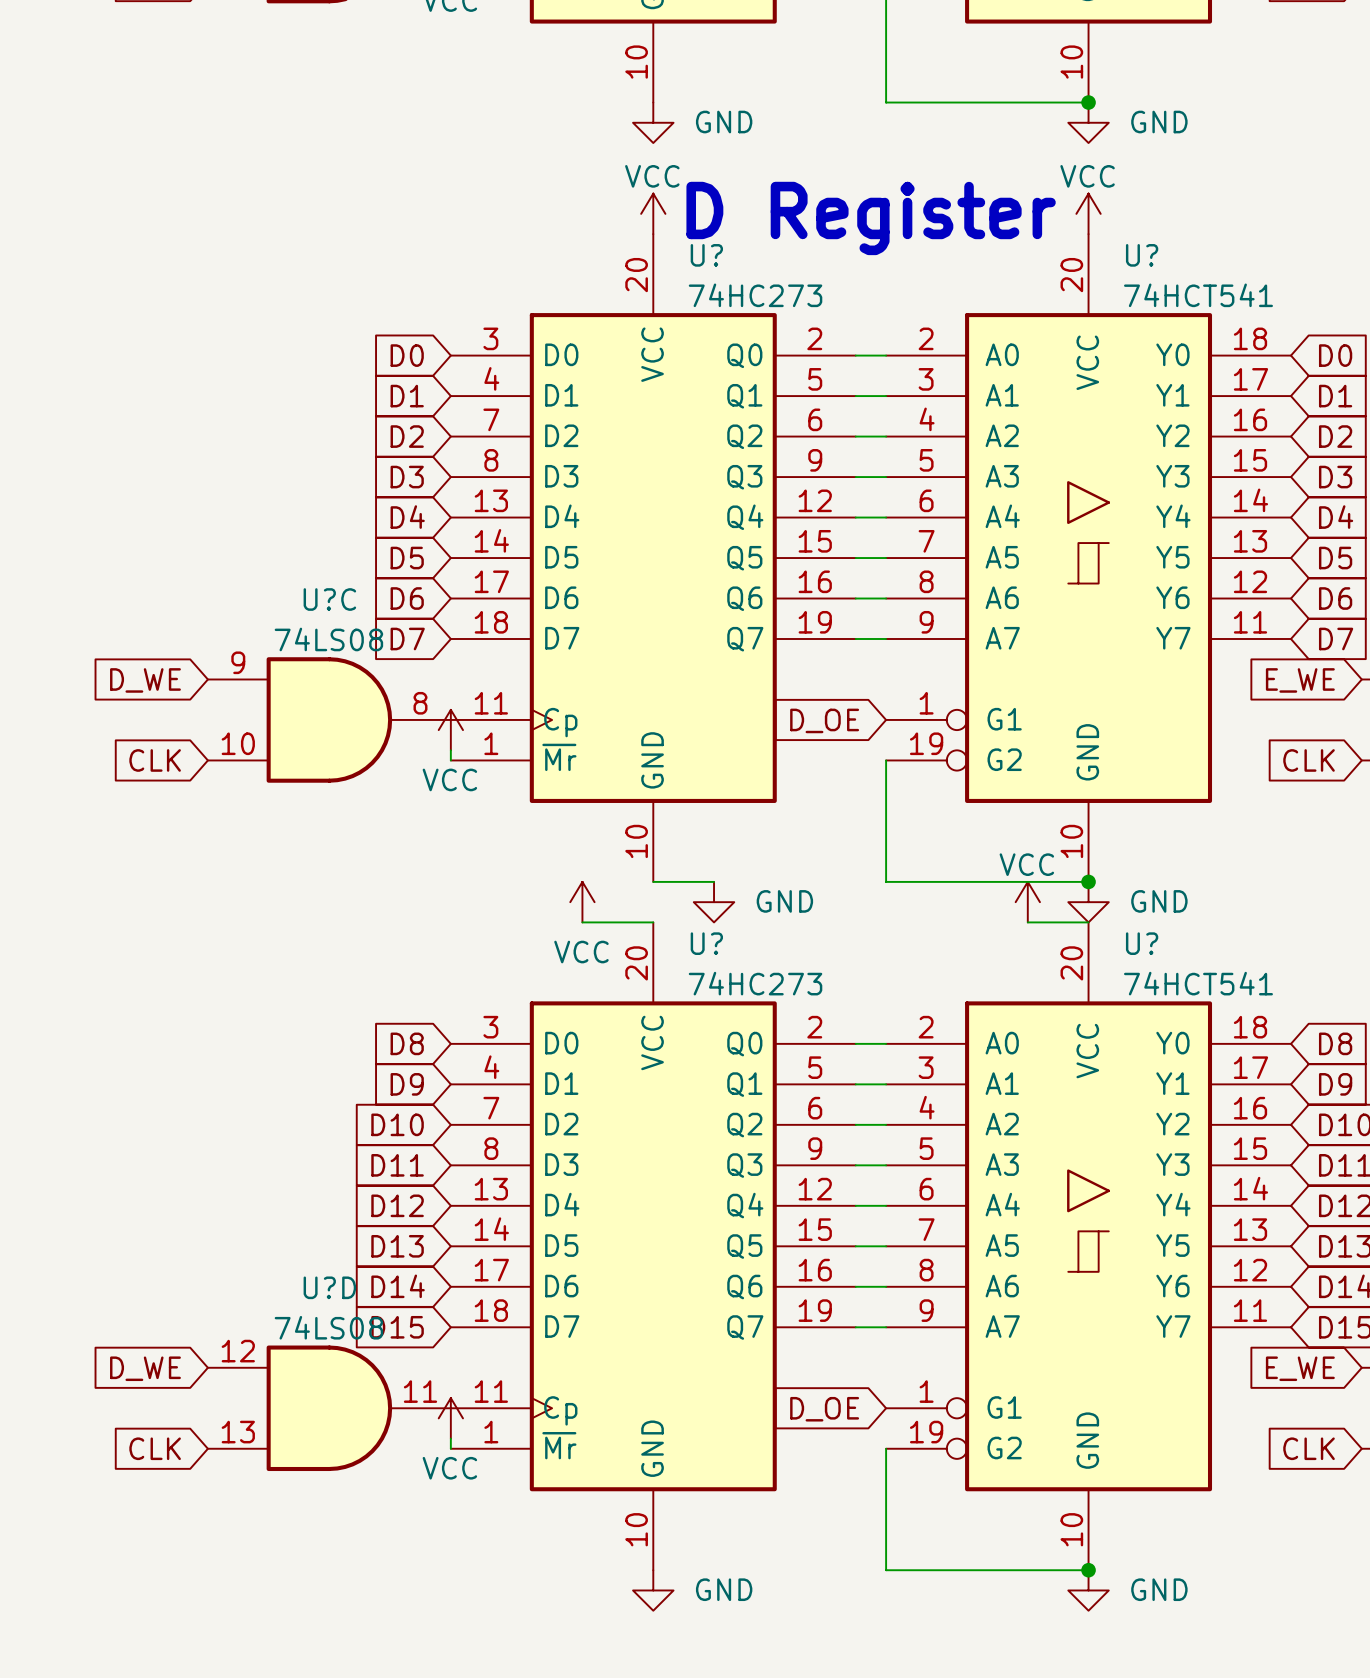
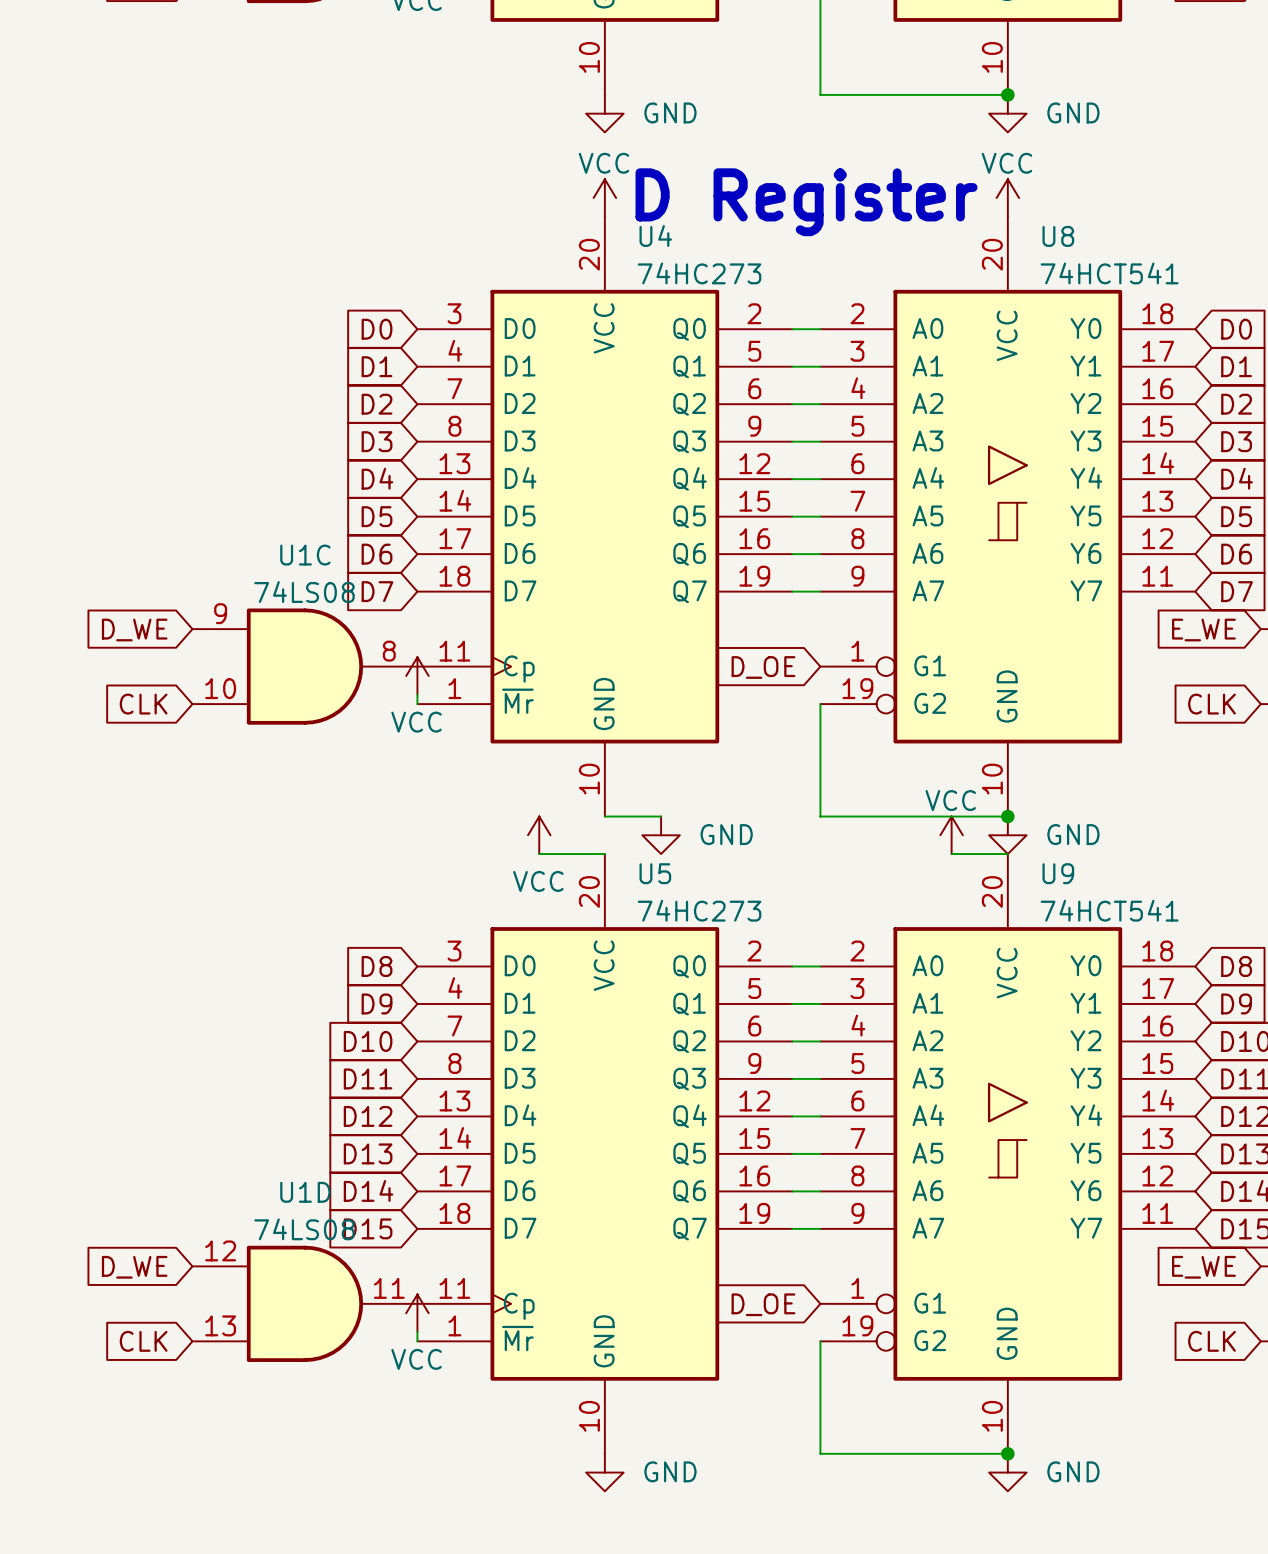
U? name: U? (706, 255) -> U4 (655, 235)
U? name: U? (1142, 255) -> U8 (1058, 236)
U?C name: U?C (329, 599) -> U1C (305, 555)
U? name: U? (706, 943) -> U5 (655, 873)
U? name: U? (1142, 943) -> U9 (1058, 873)
U?D name: U?D (329, 1287) -> U1D (305, 1192)

